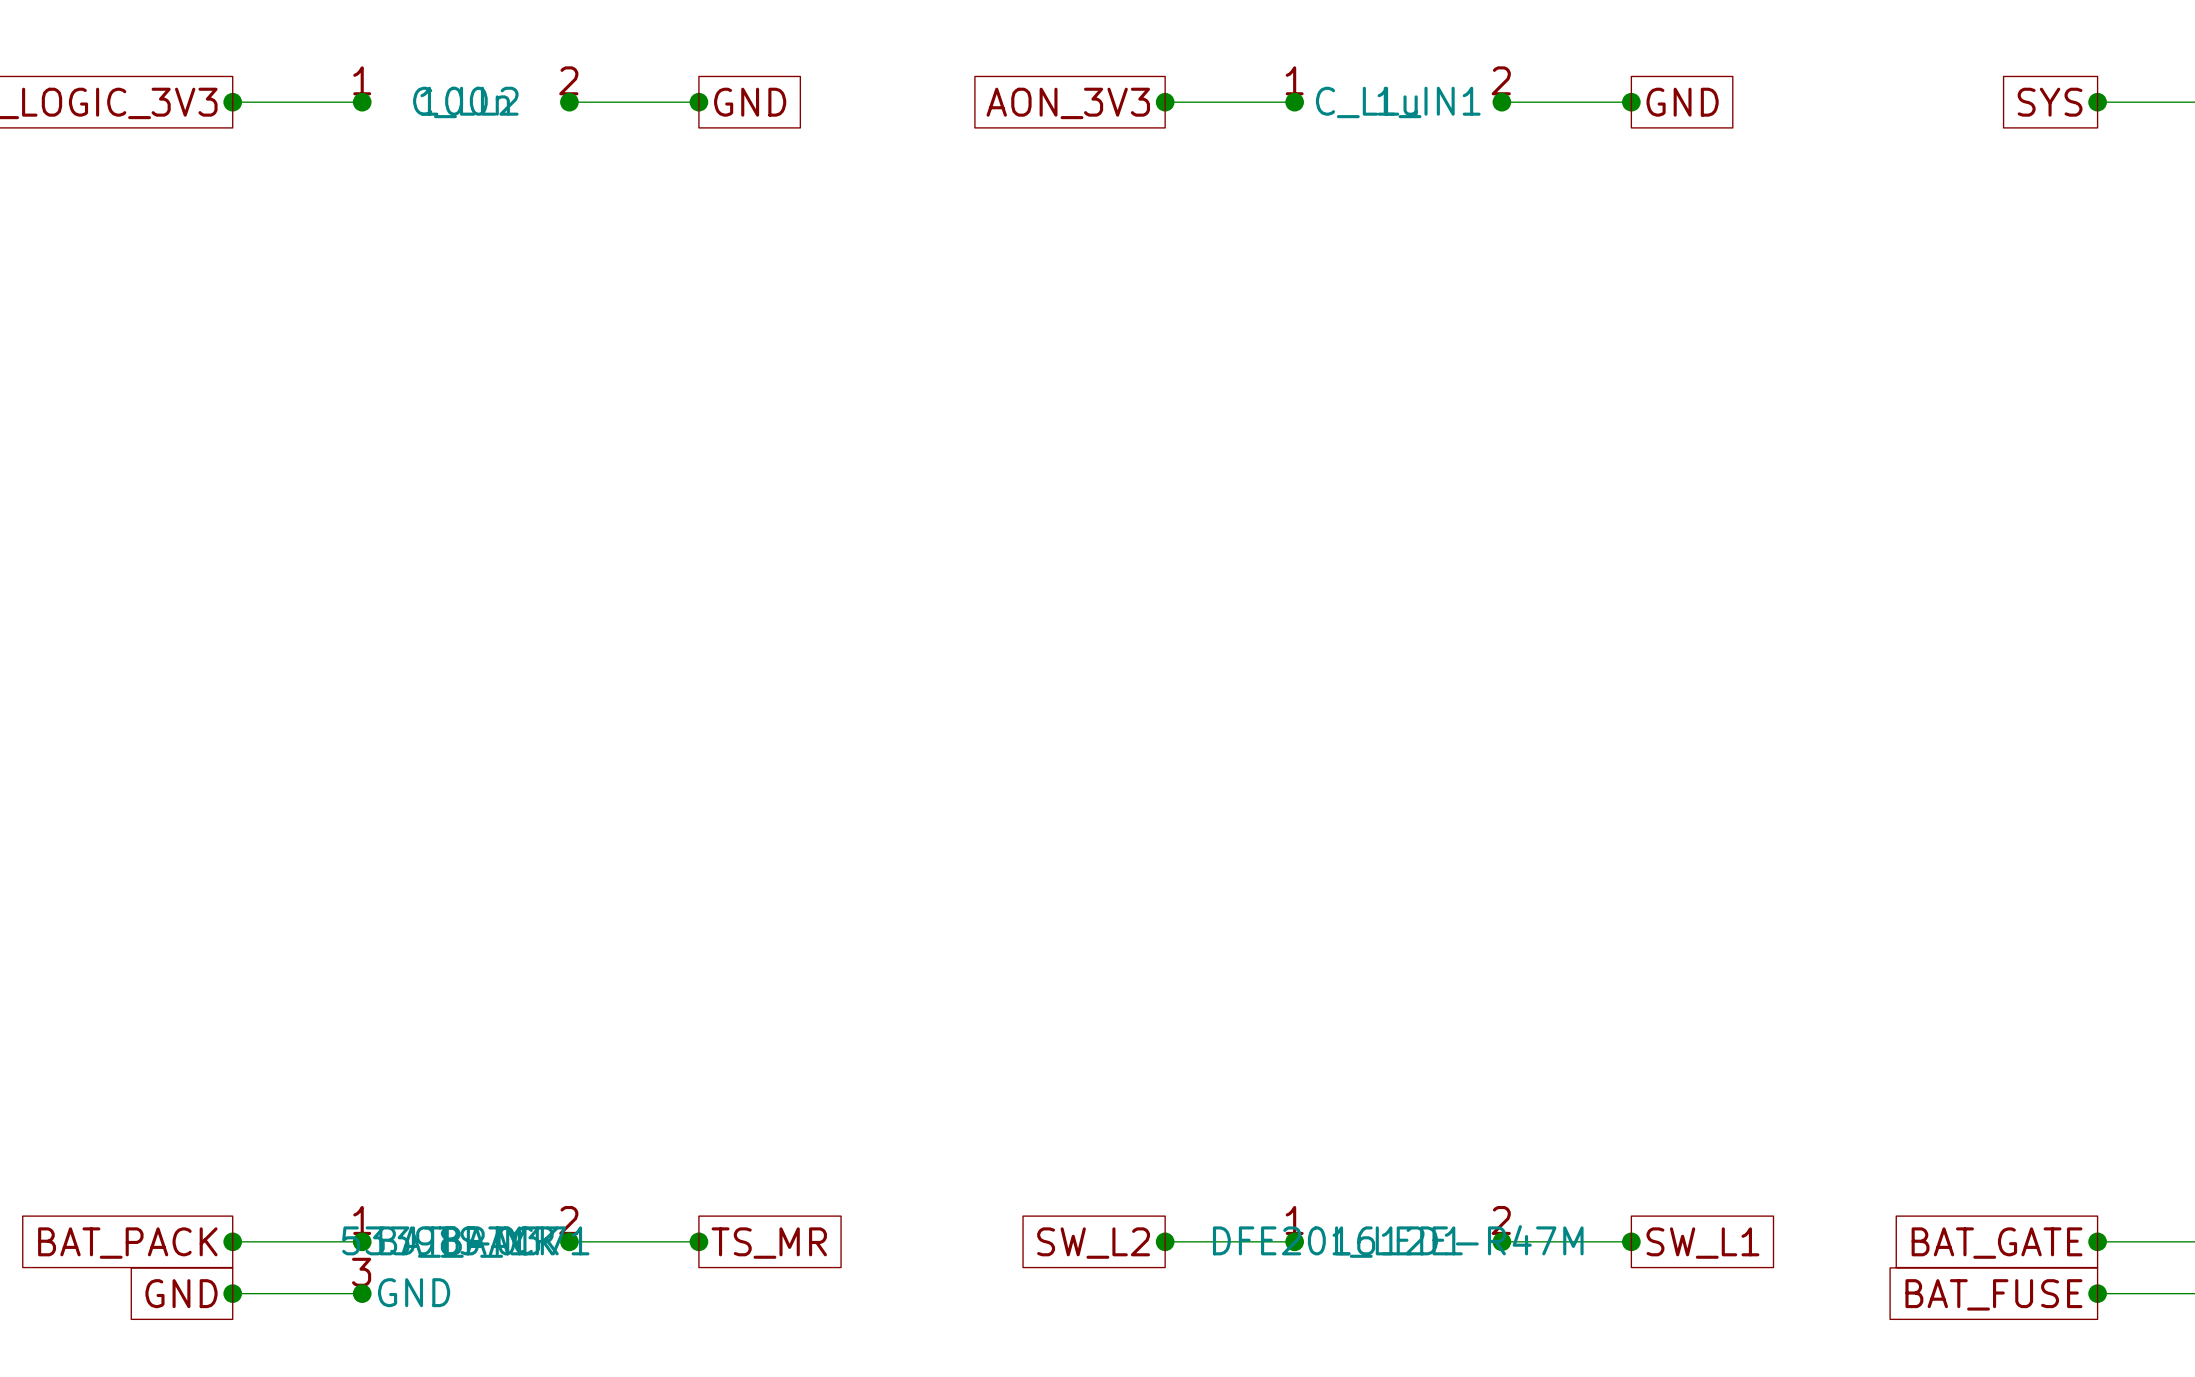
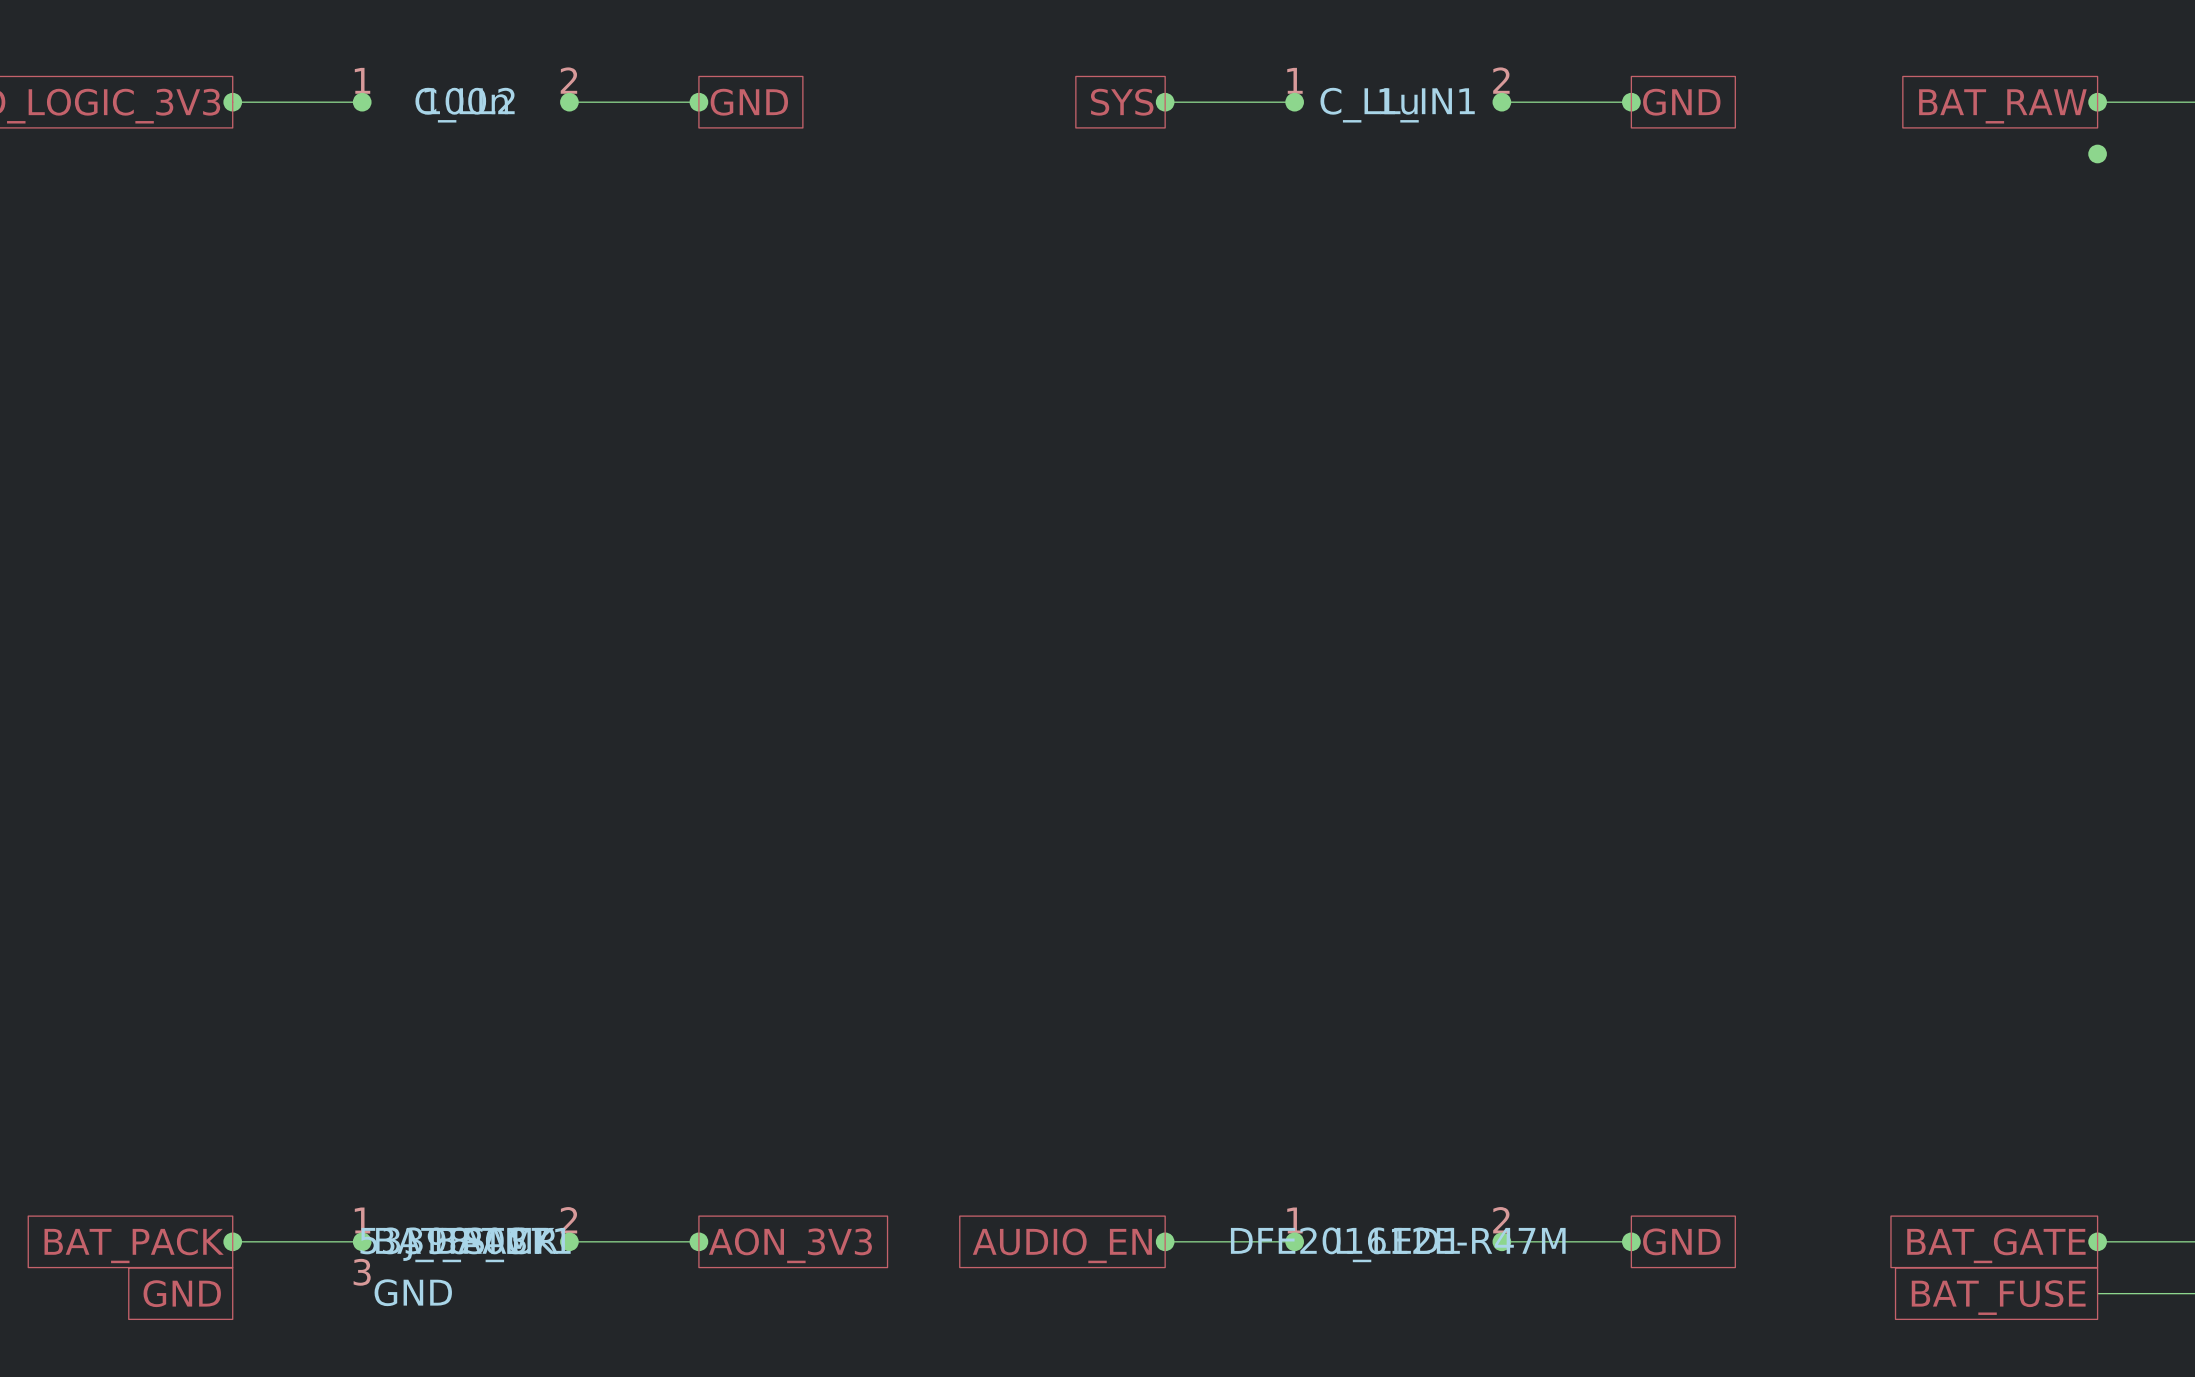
global label: SYS (2050, 102) -> BAT_RAW (2002, 106)
global label: AON_3V3 (1068, 103) -> SYS (1122, 102)
junction: none -> (2097, 153)
global label: TS_MR (769, 1243) -> AON_3V3 (790, 1245)
global label: SW_L2 (1093, 1243) -> AUDIO_EN (1062, 1245)
global label: SW_L1 (1702, 1243) -> GND (1681, 1241)
wire: (232, 1293) (362, 1293) -> none
junction: (232, 1293) -> none
junction: (362, 1293) -> none
junction: (2097, 1293) -> none

